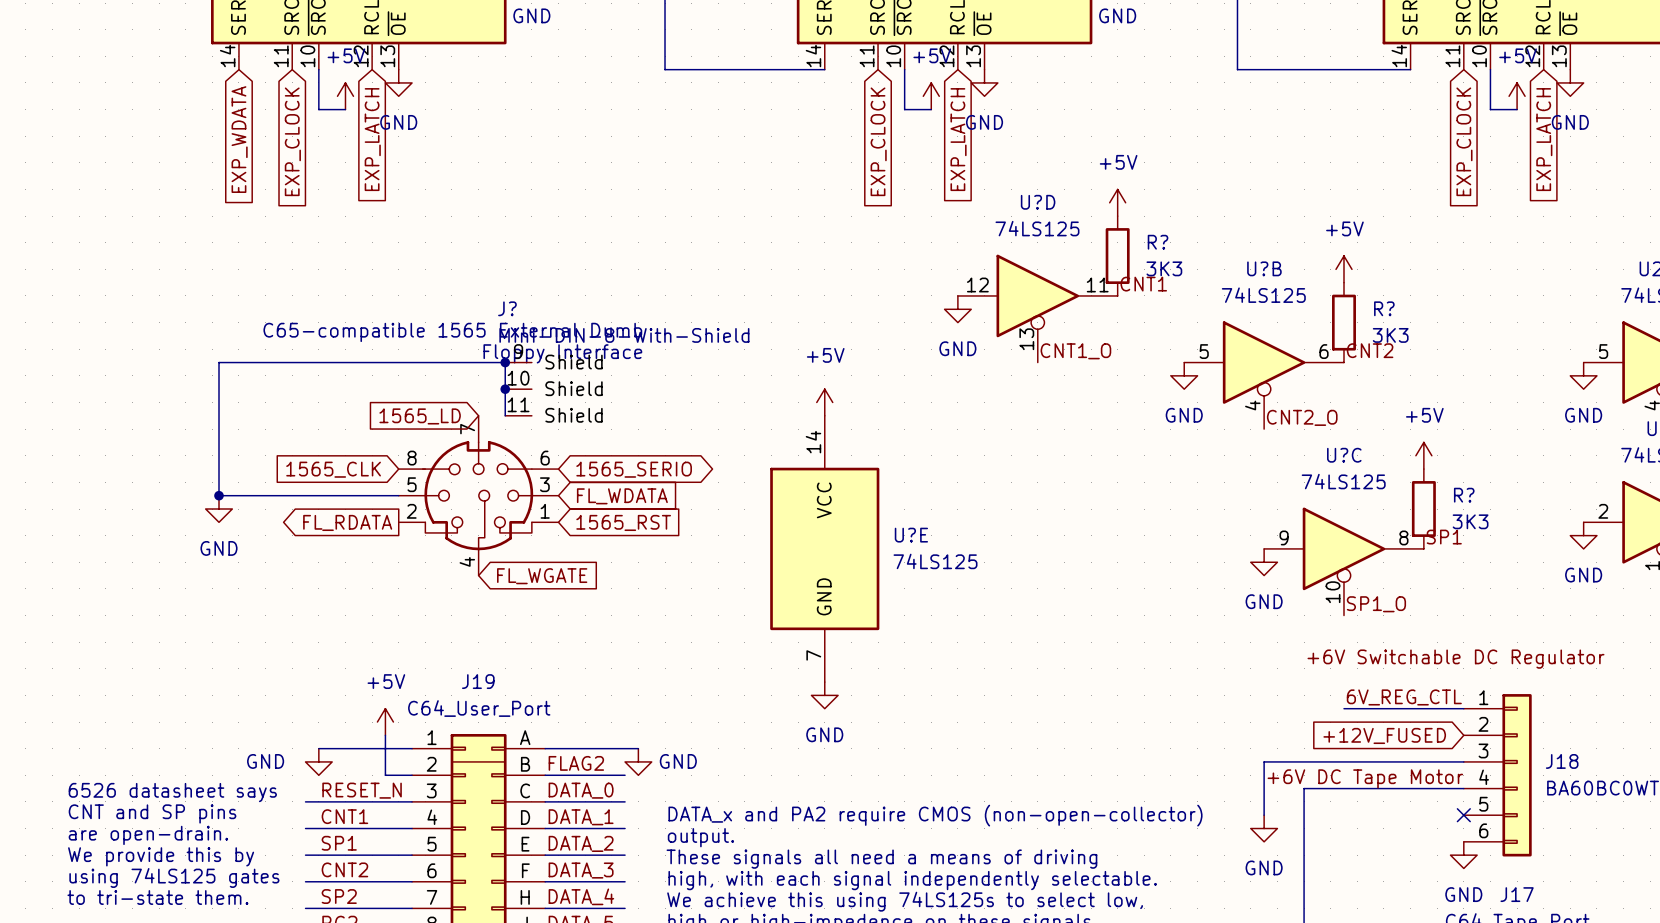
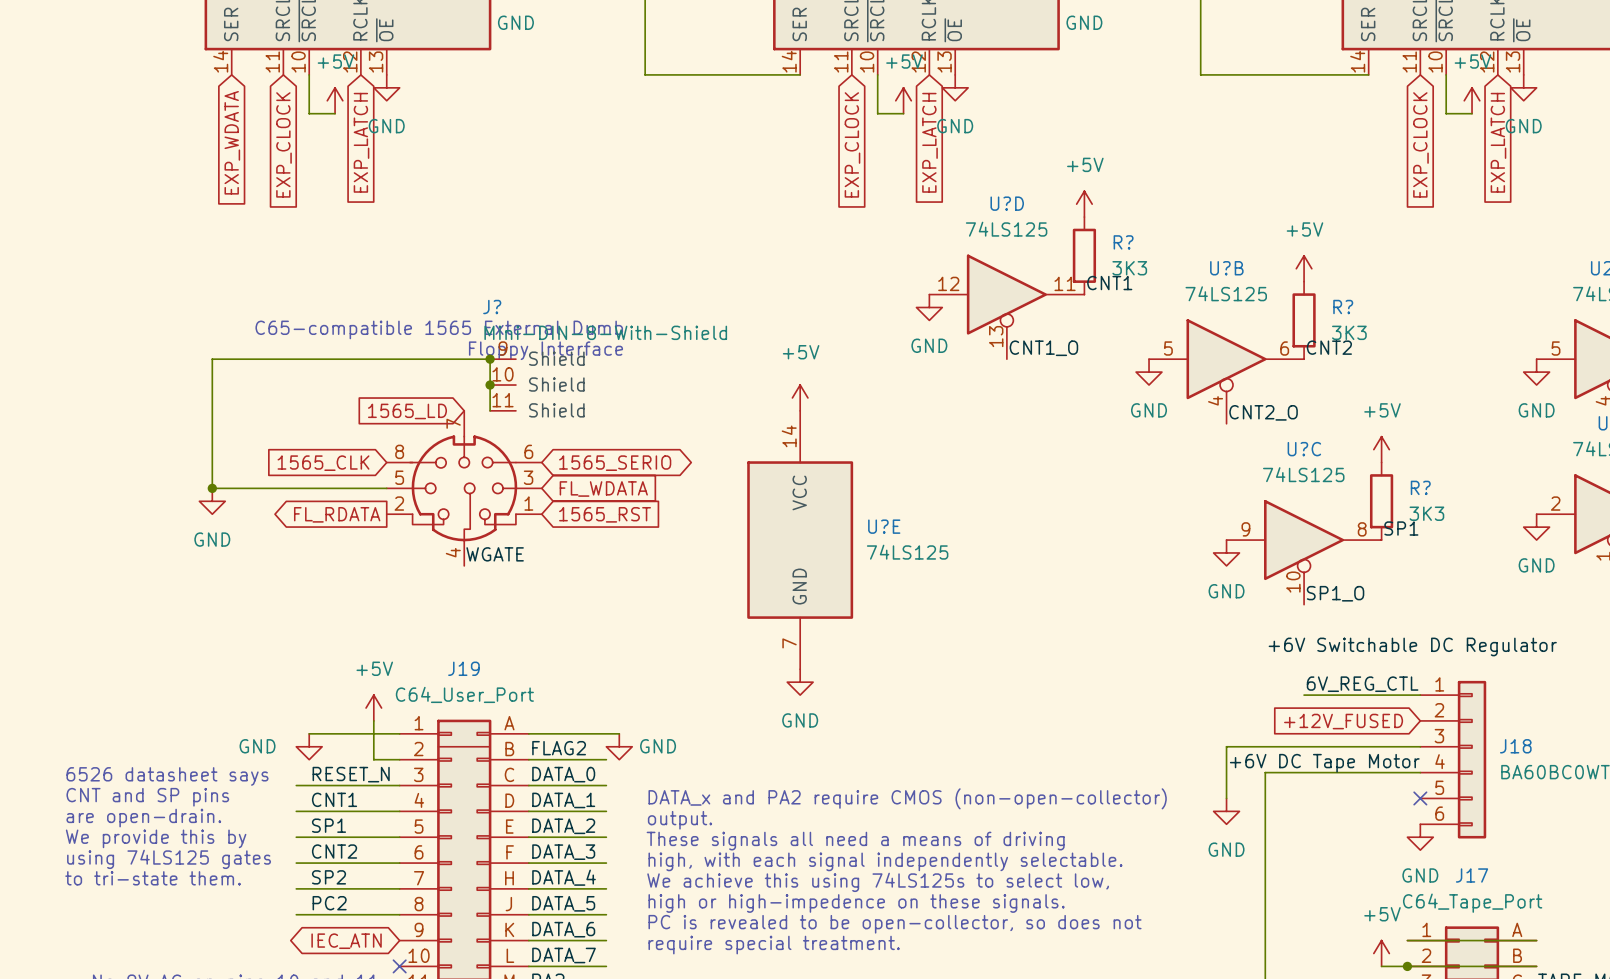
label: none -> WGATE (495, 554)
global label: FL_WGATE (542, 576) -> none

